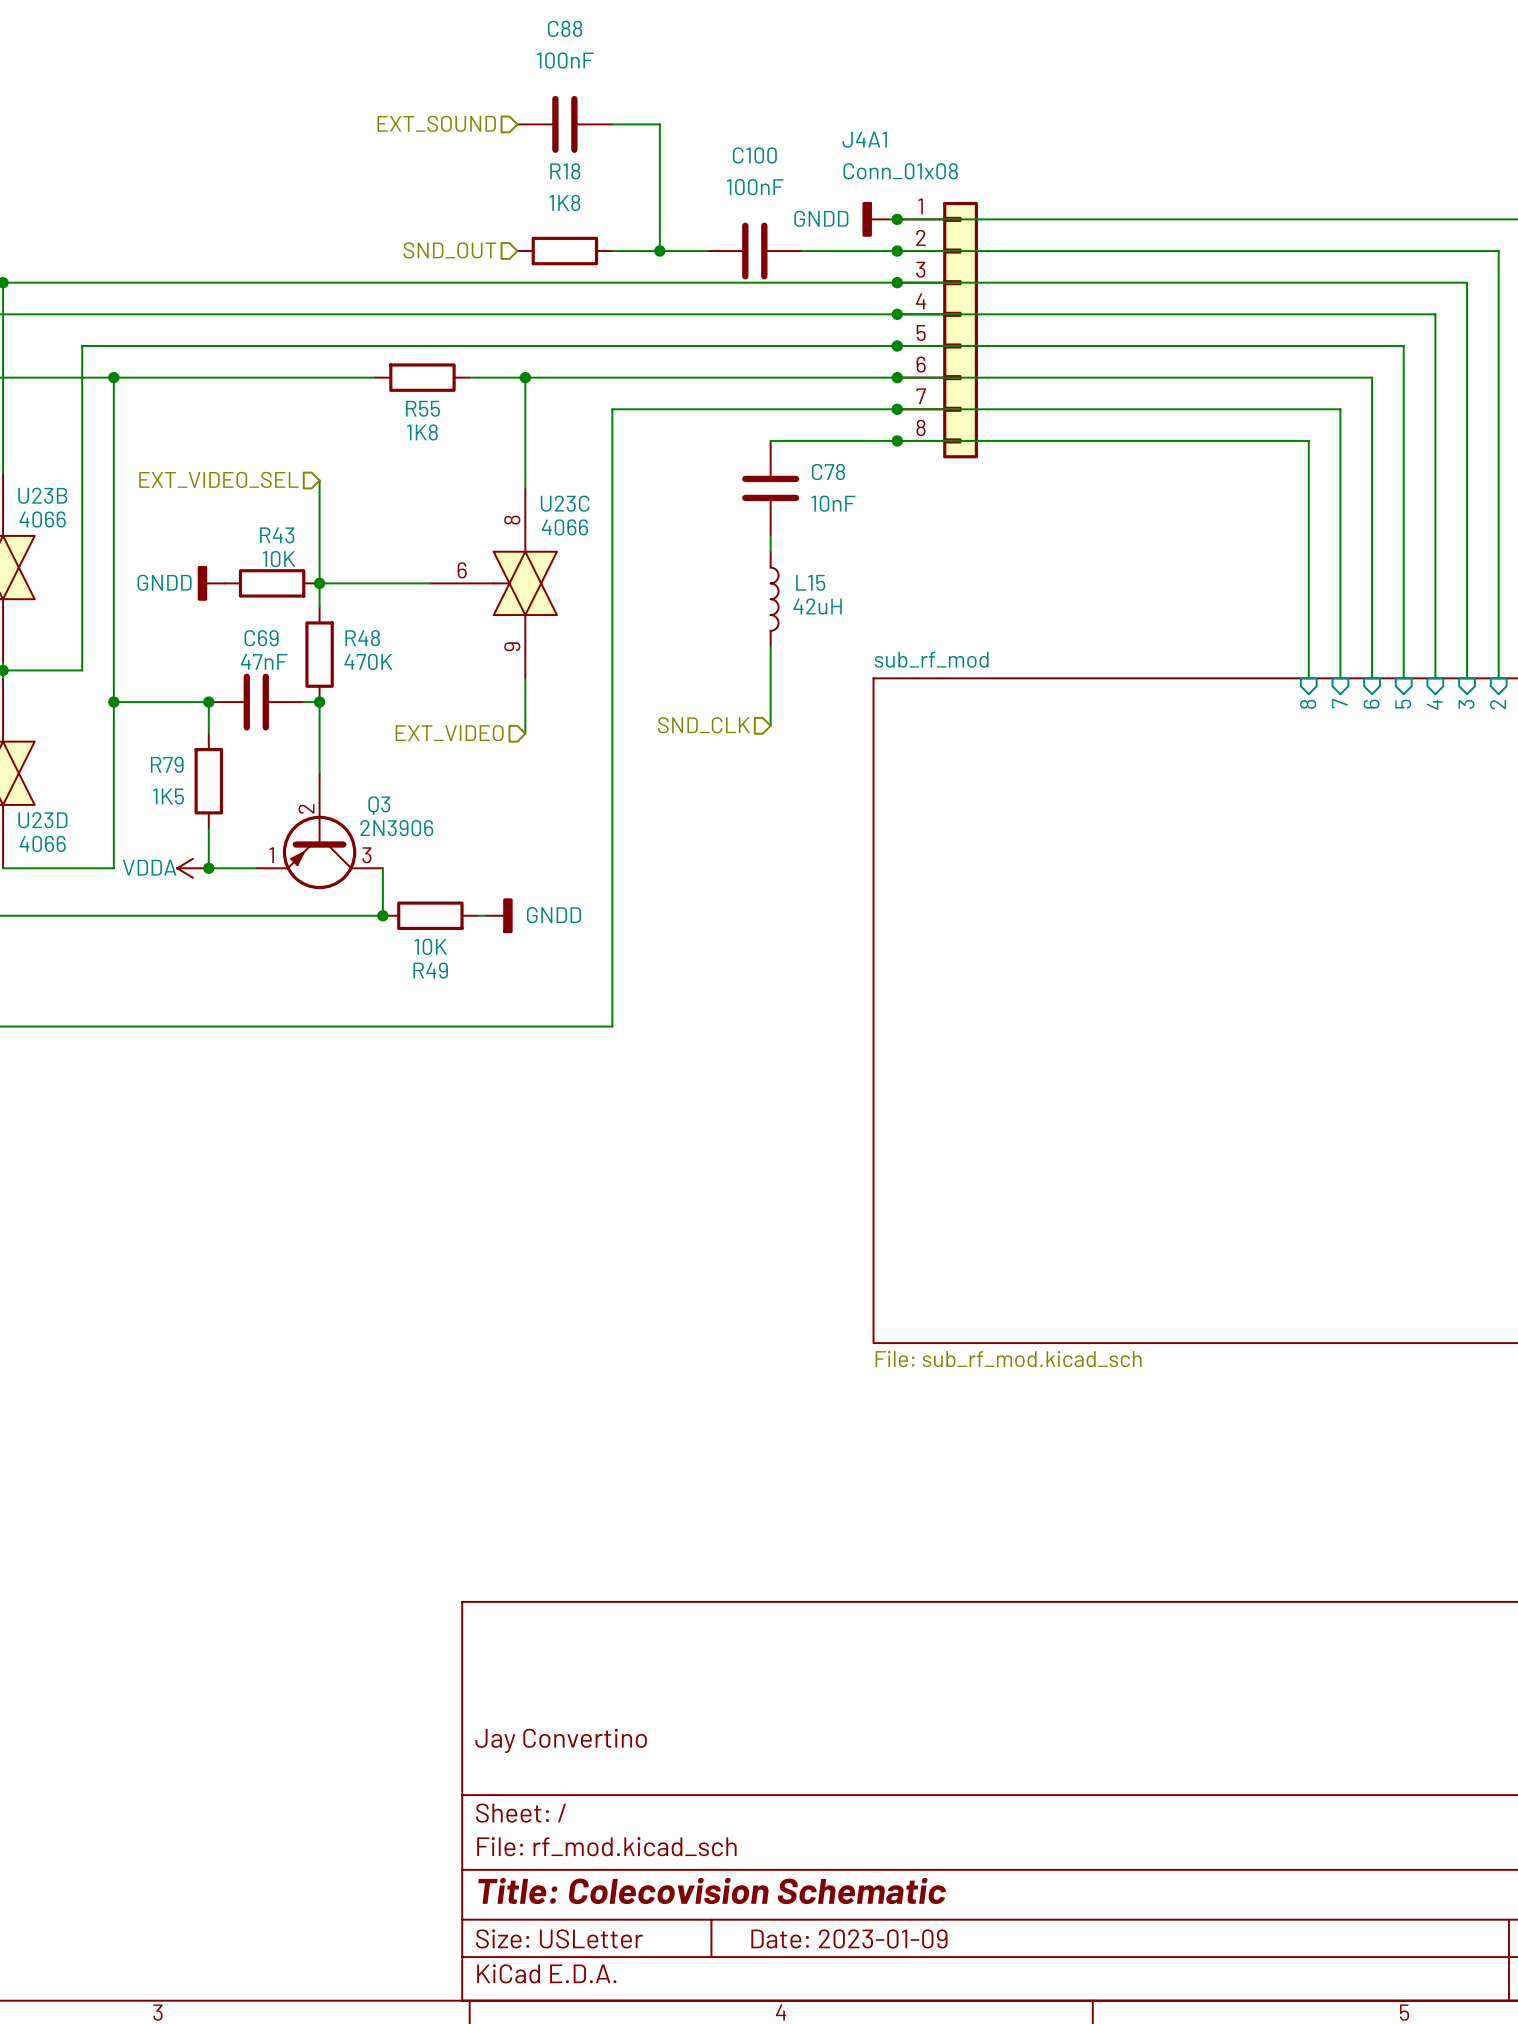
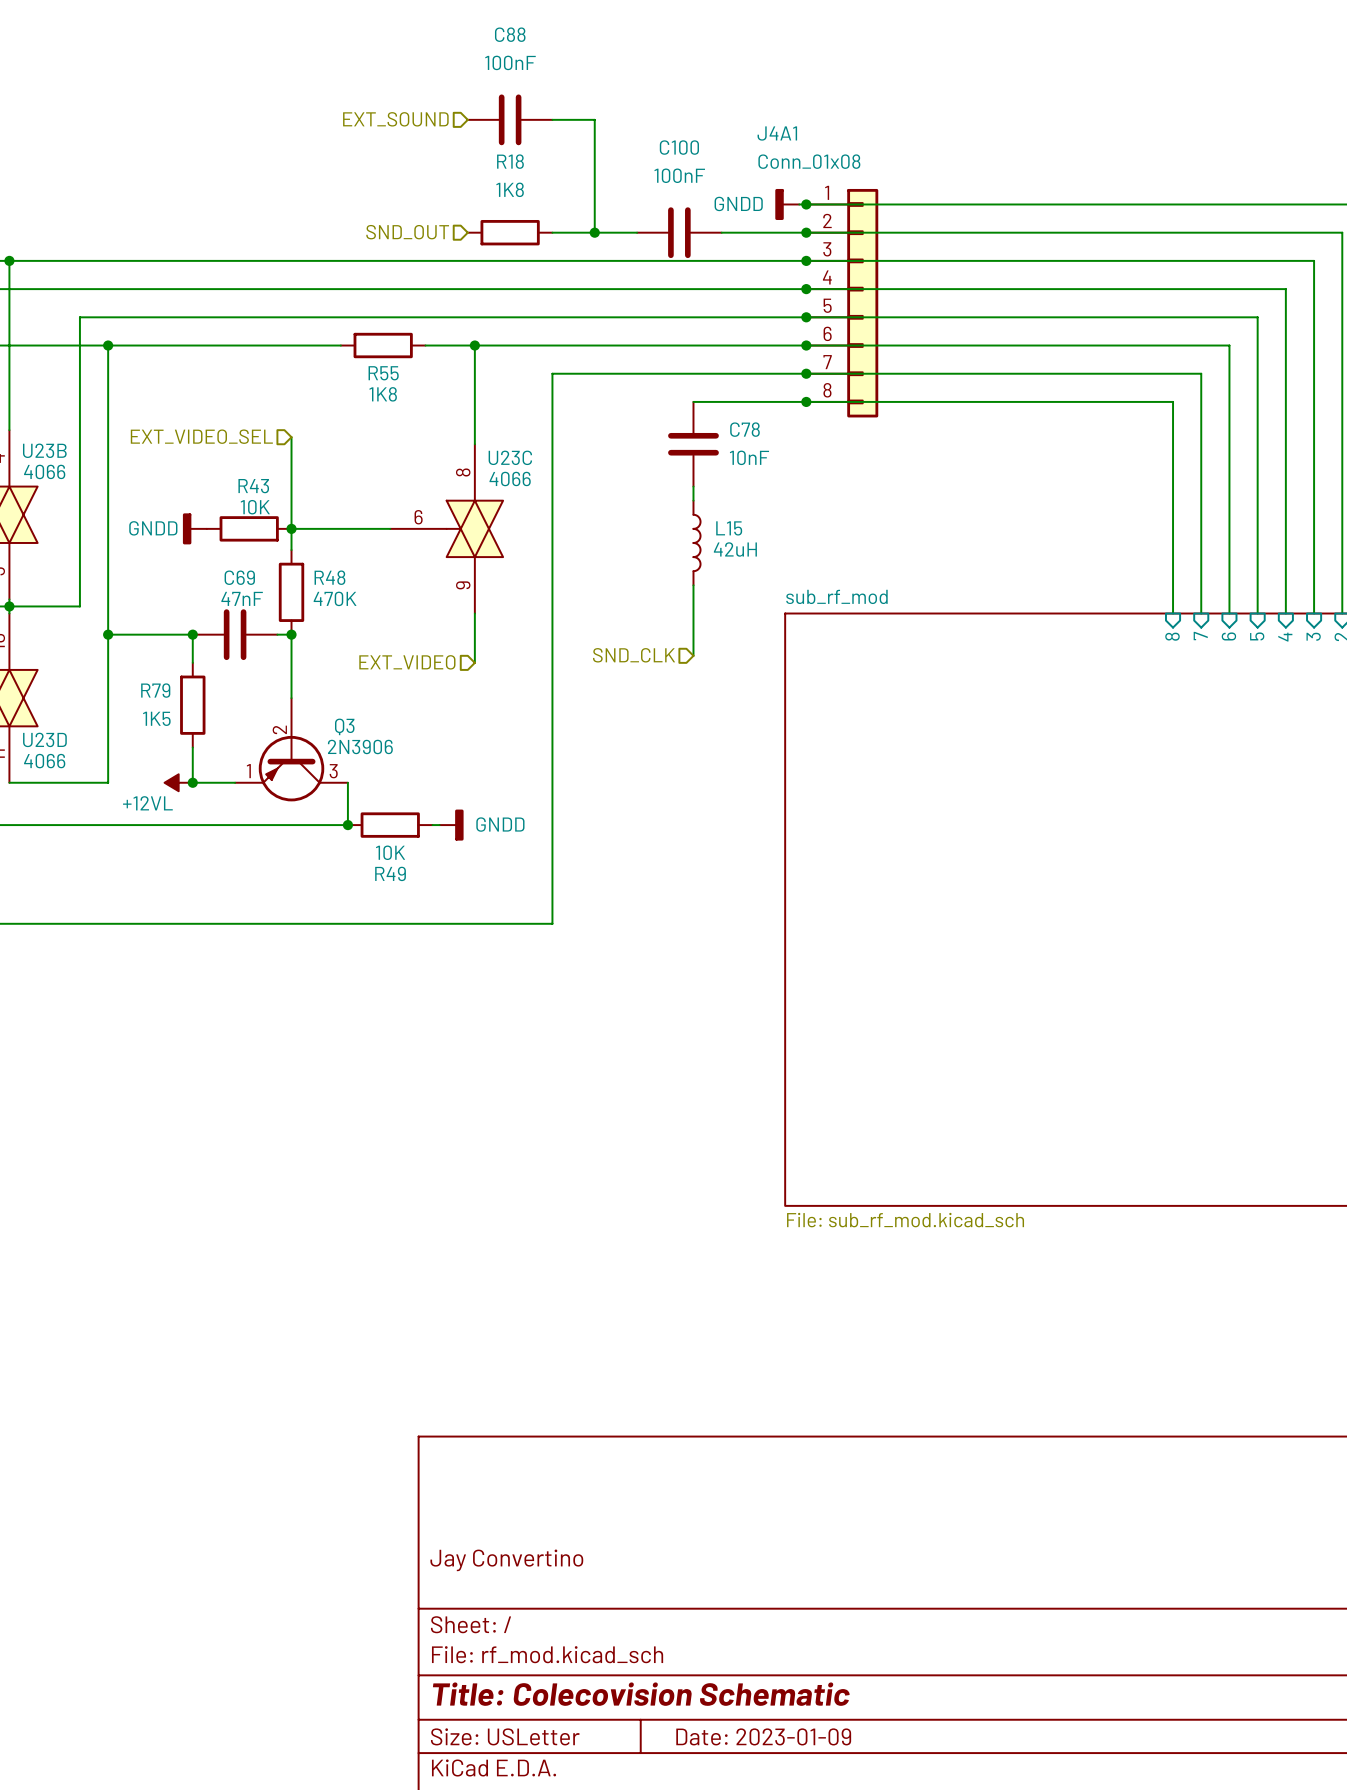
power symbol: VDDA (192, 868) -> +12VL (178, 782)

